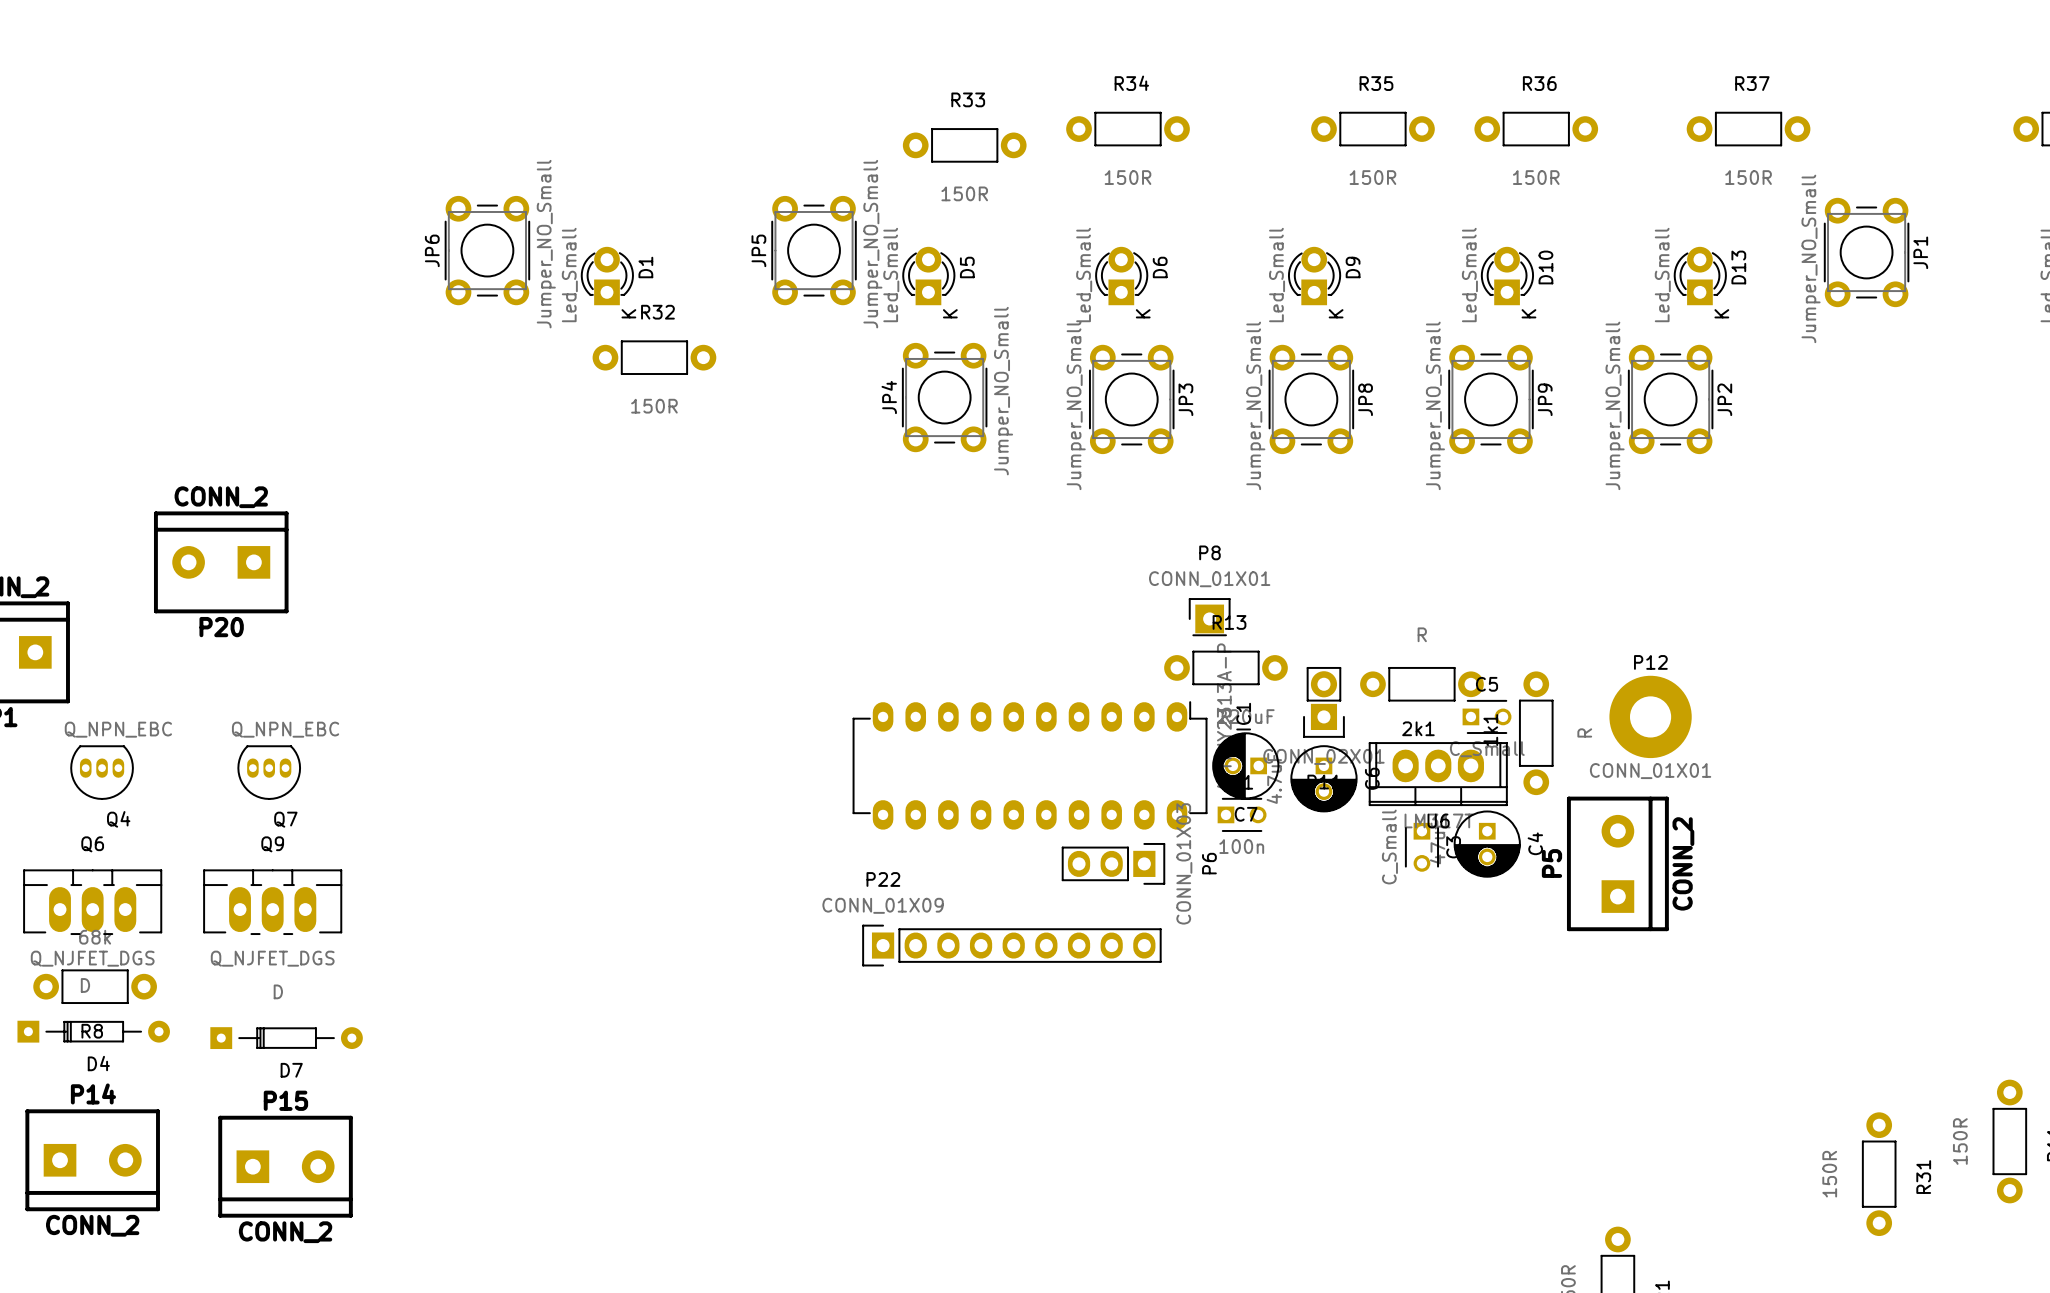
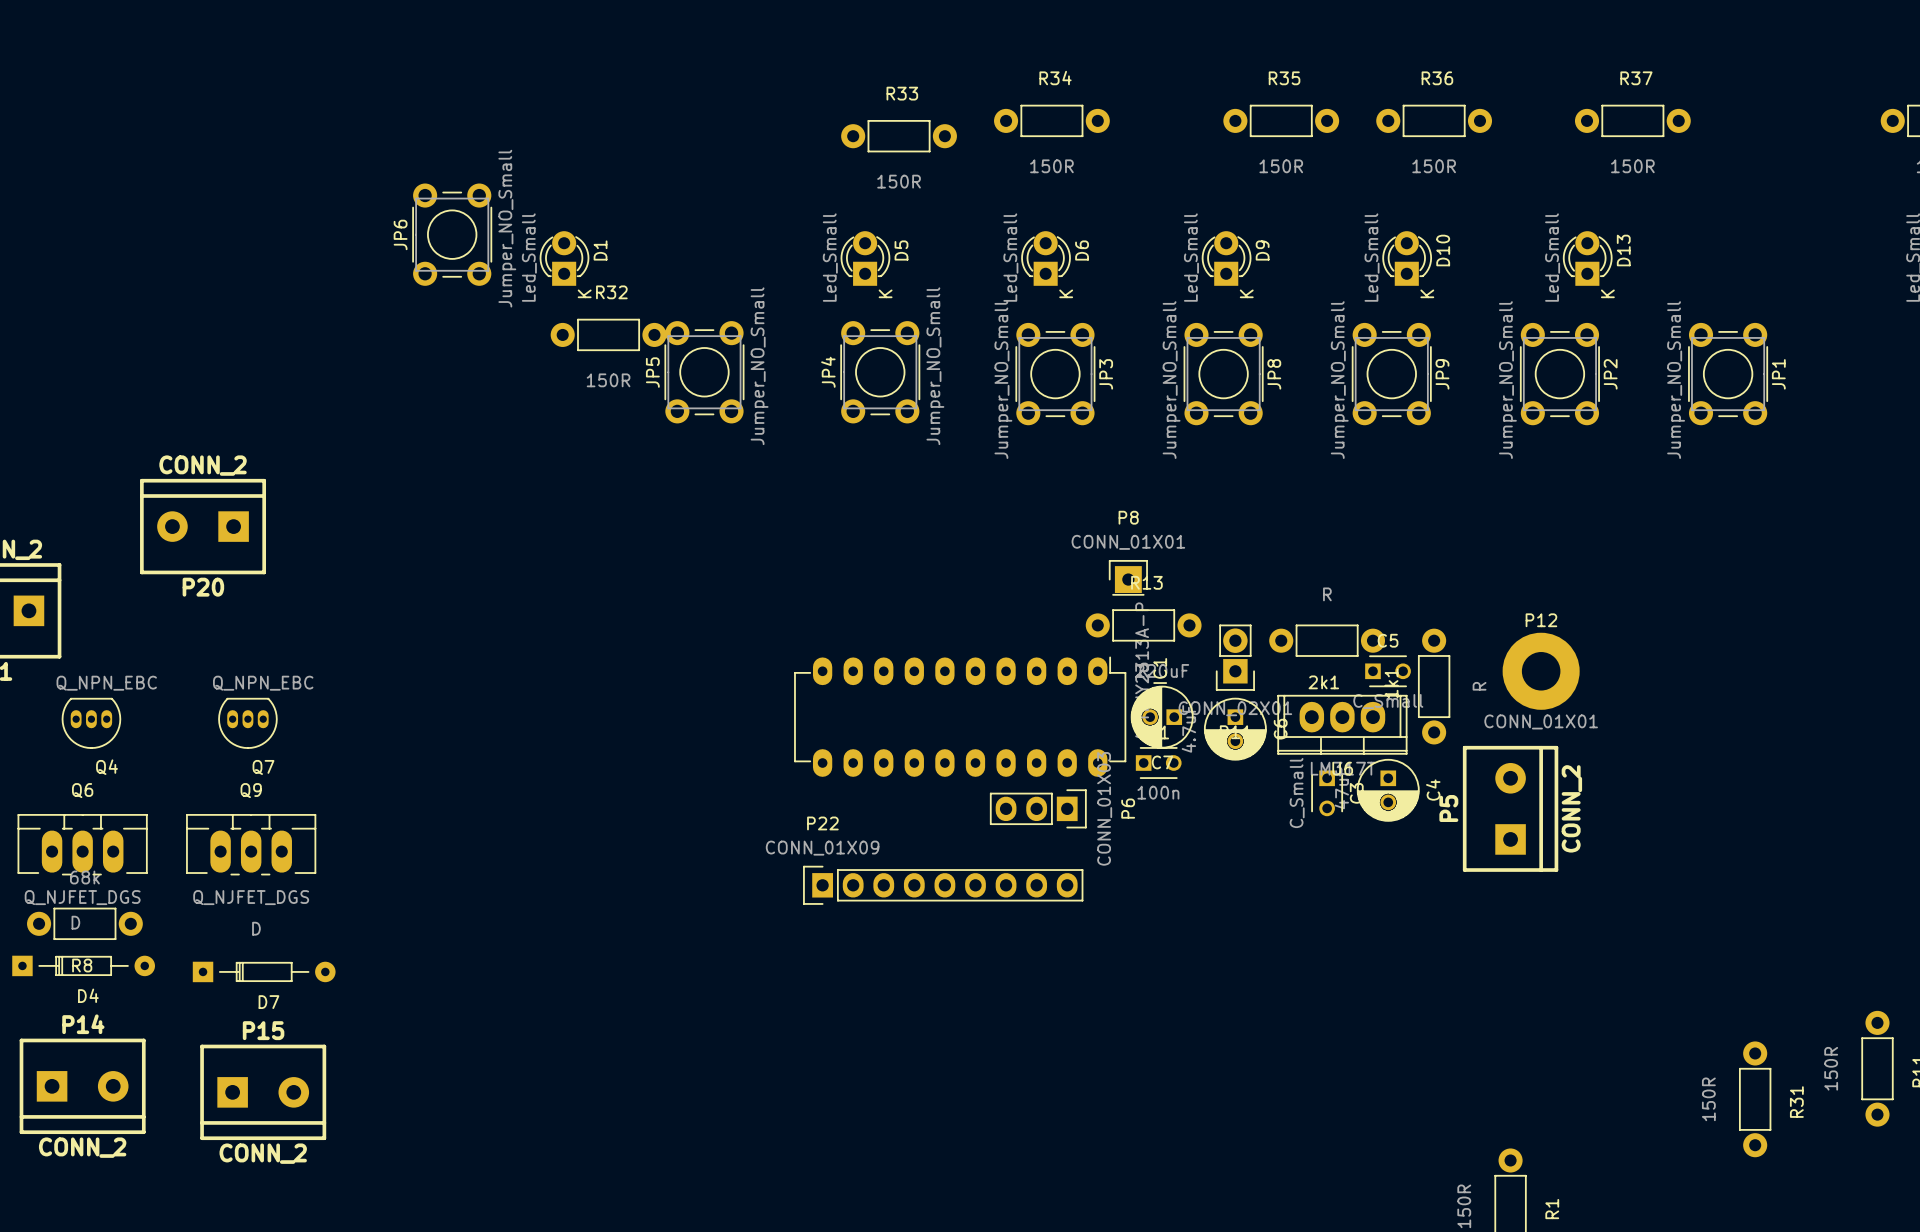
JP5 position: (814, 250) -> (704, 372)
JP1 position: (1866, 252) -> (1728, 374)

